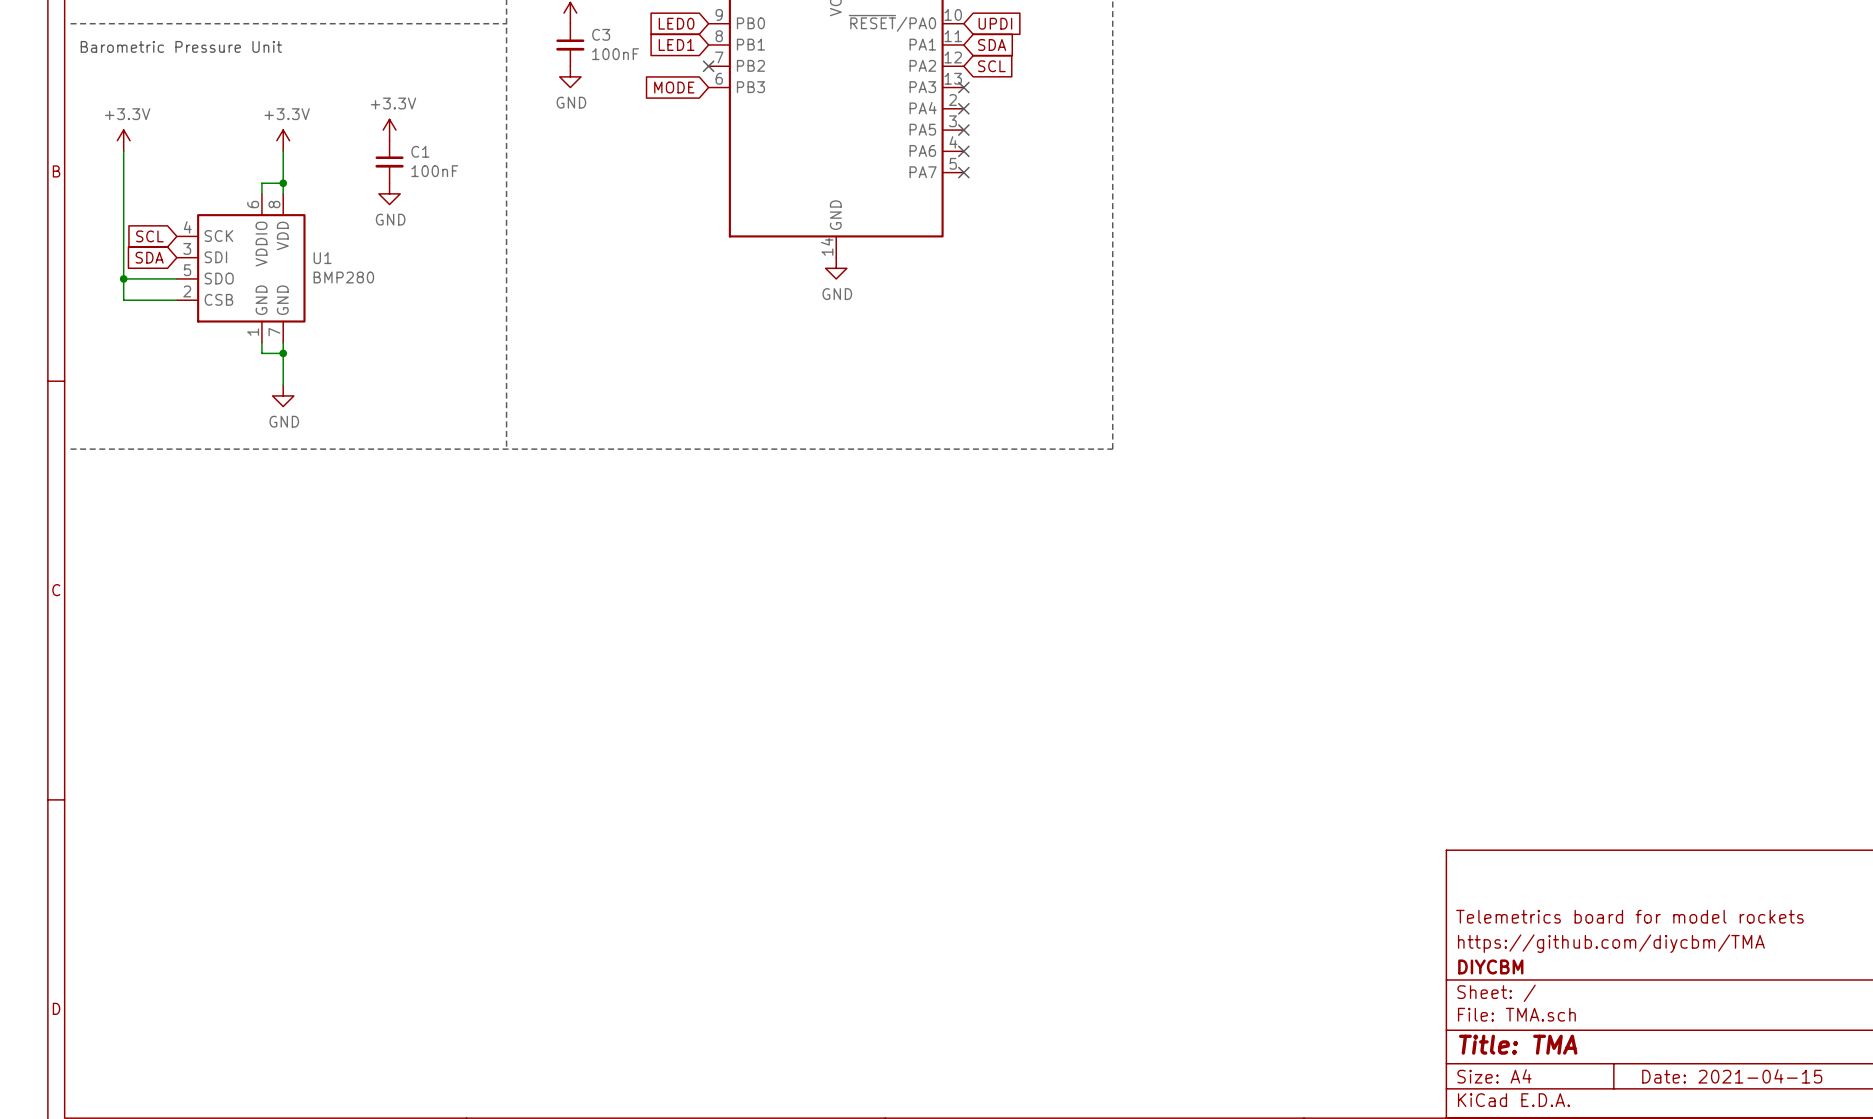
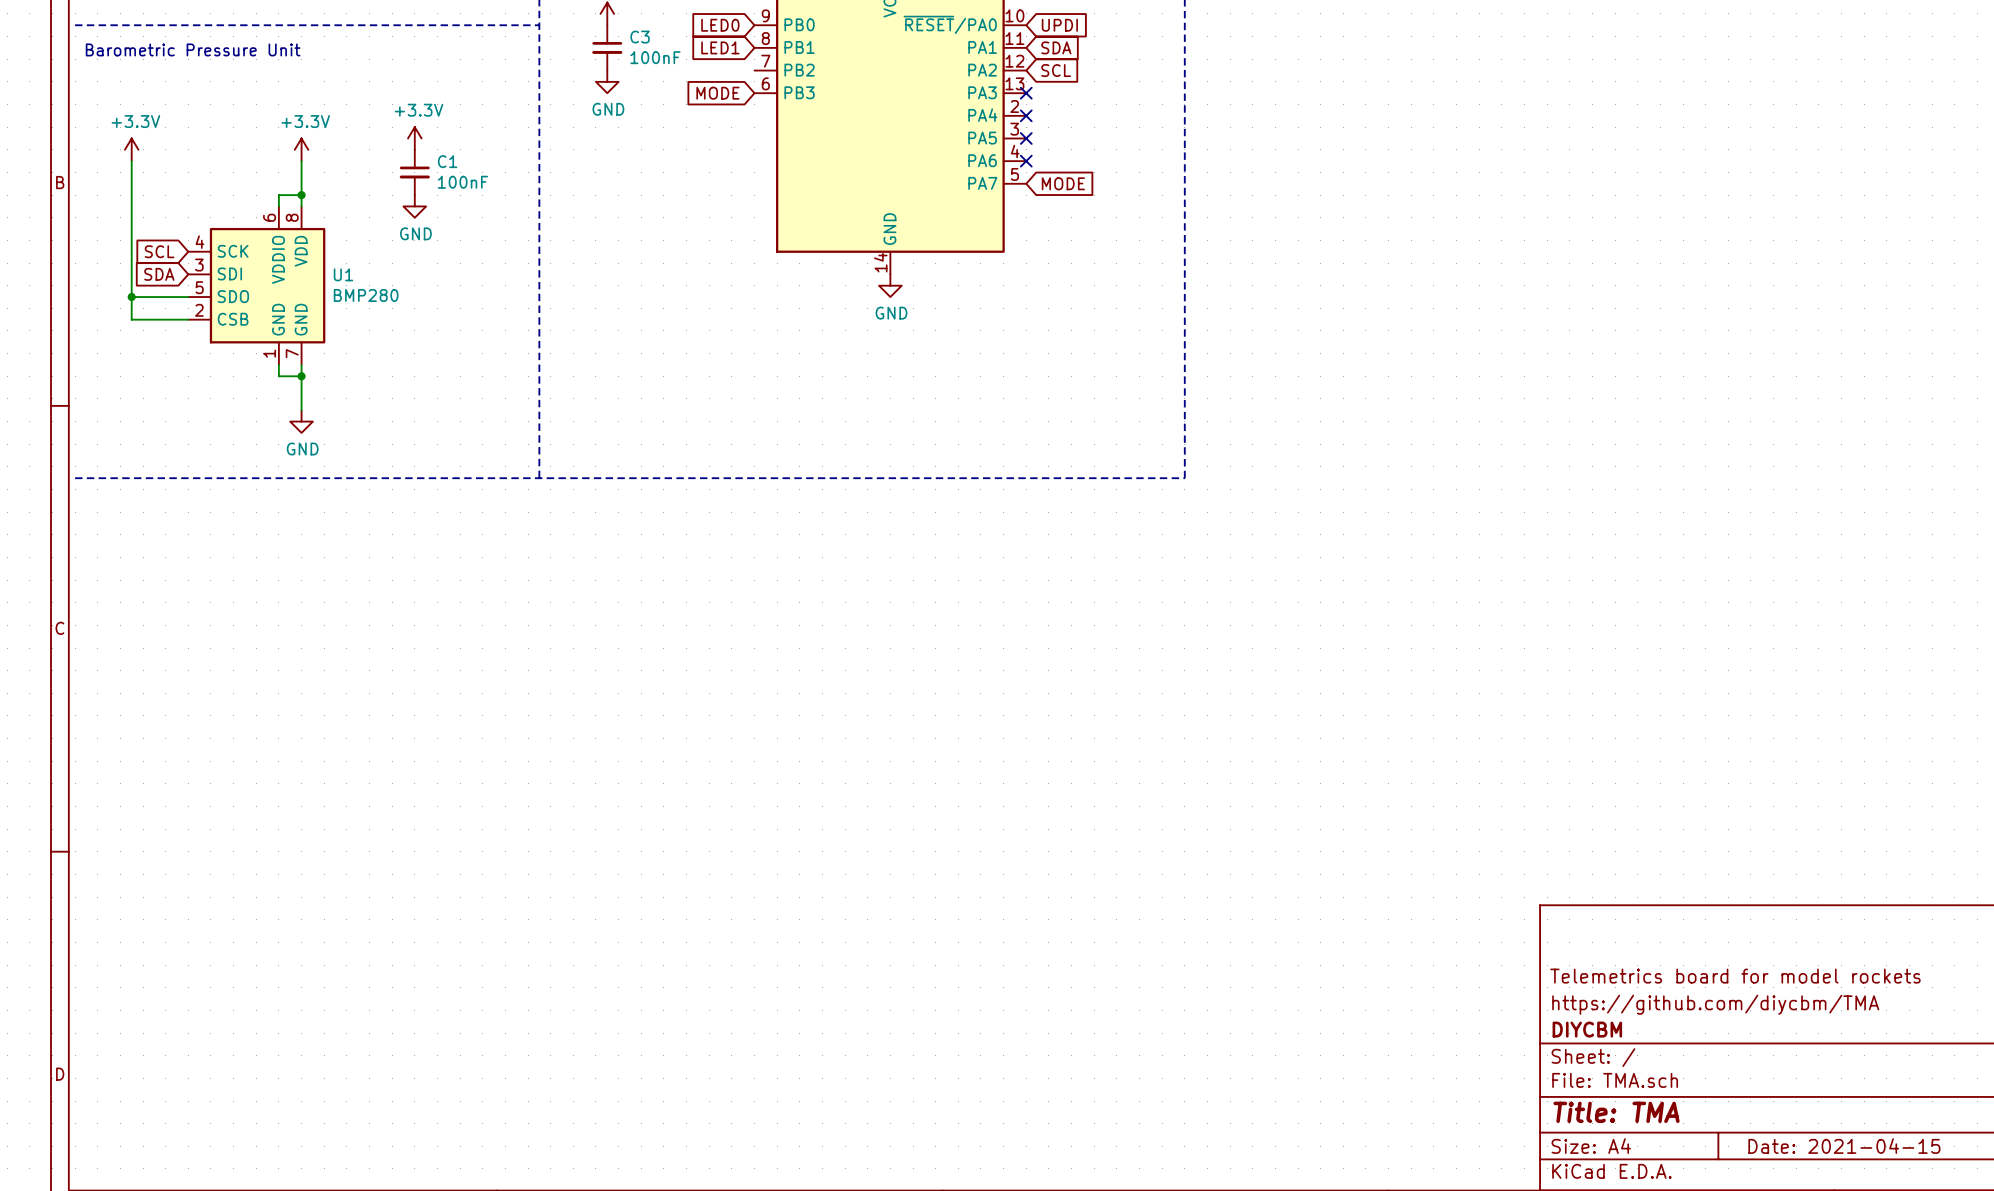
no-connect mark: (708, 66) -> none
no-connect mark: (963, 172) -> none
global label: none -> MODE (1063, 183)

